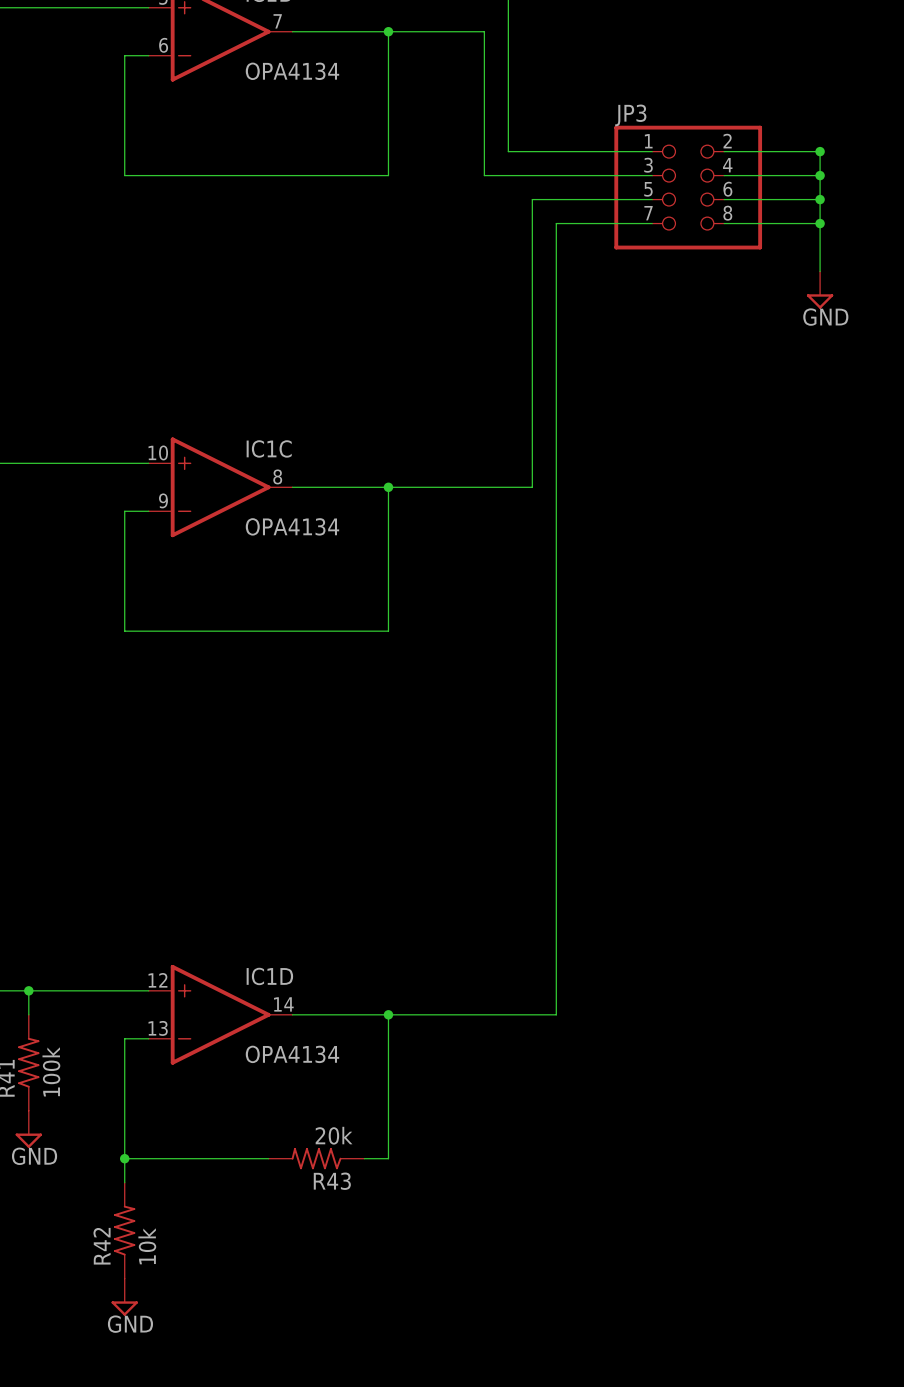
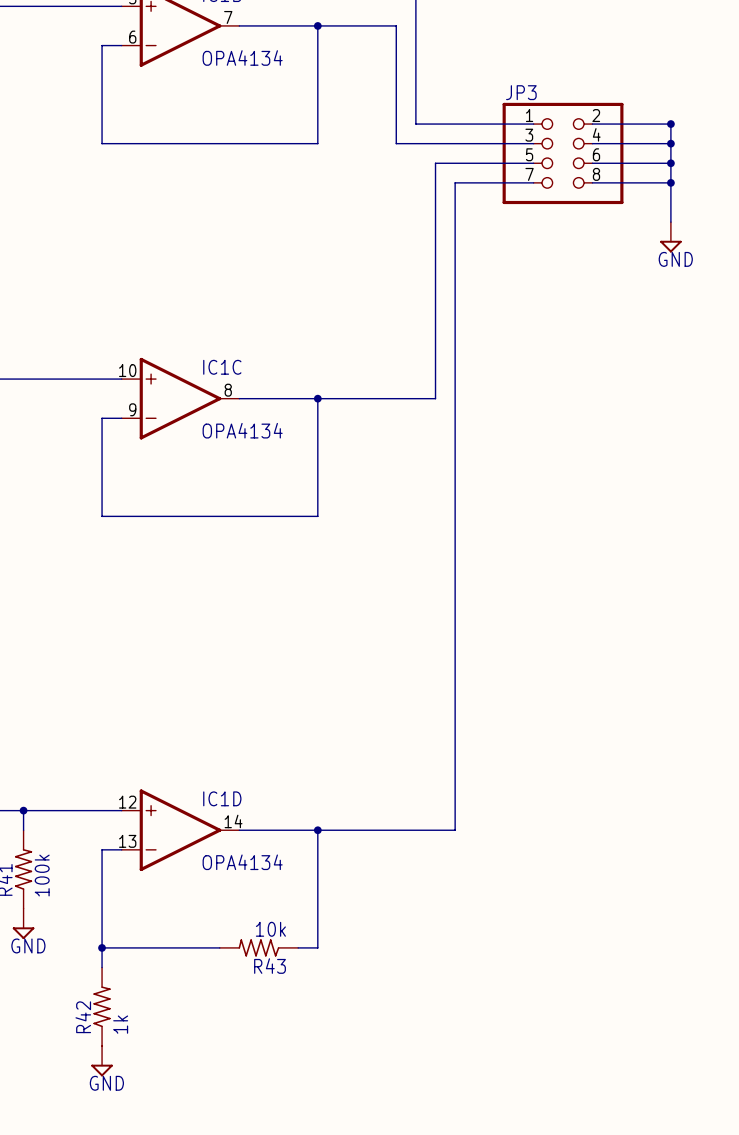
R43 value: 20k (334, 1135) -> 10k (270, 929)
R42 value: 10k (147, 1246) -> 1k (120, 1024)

